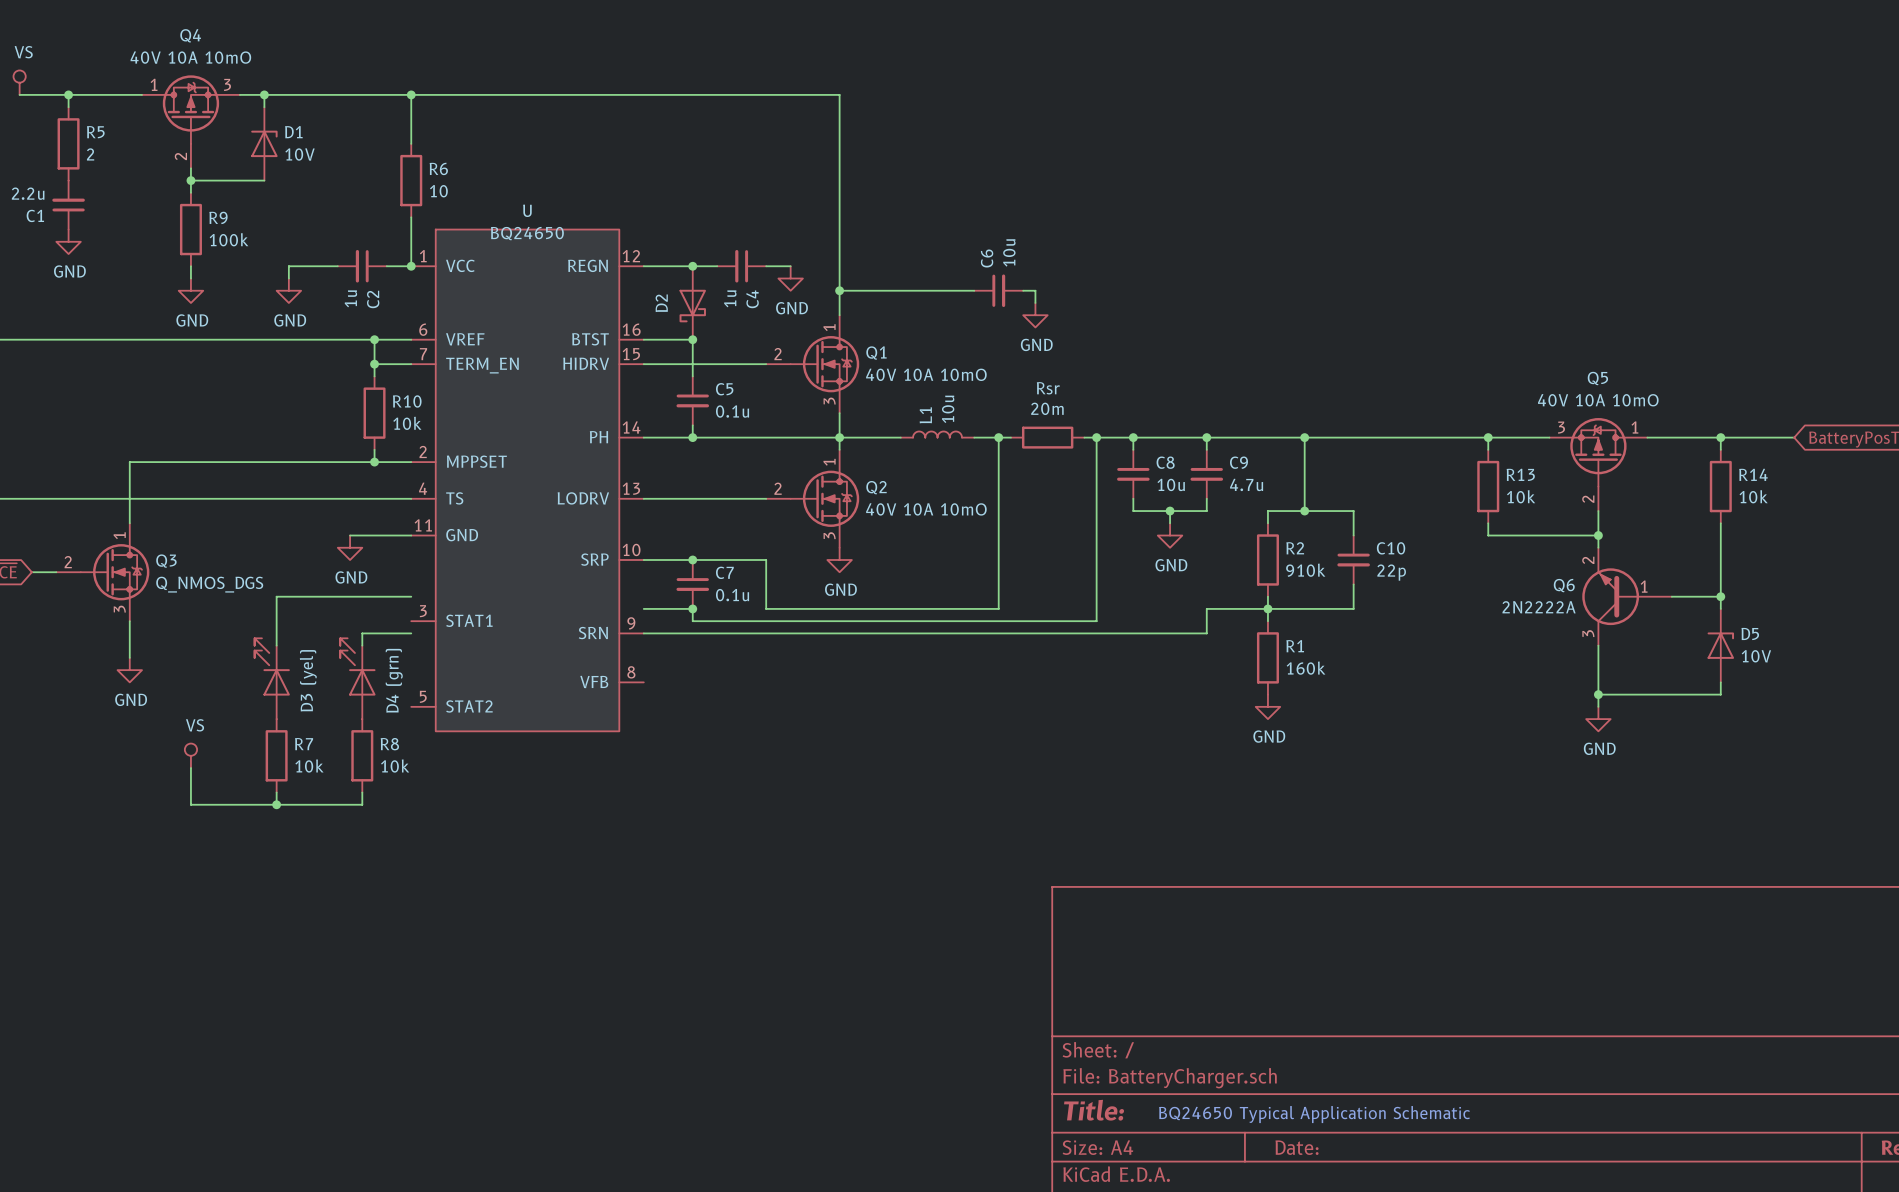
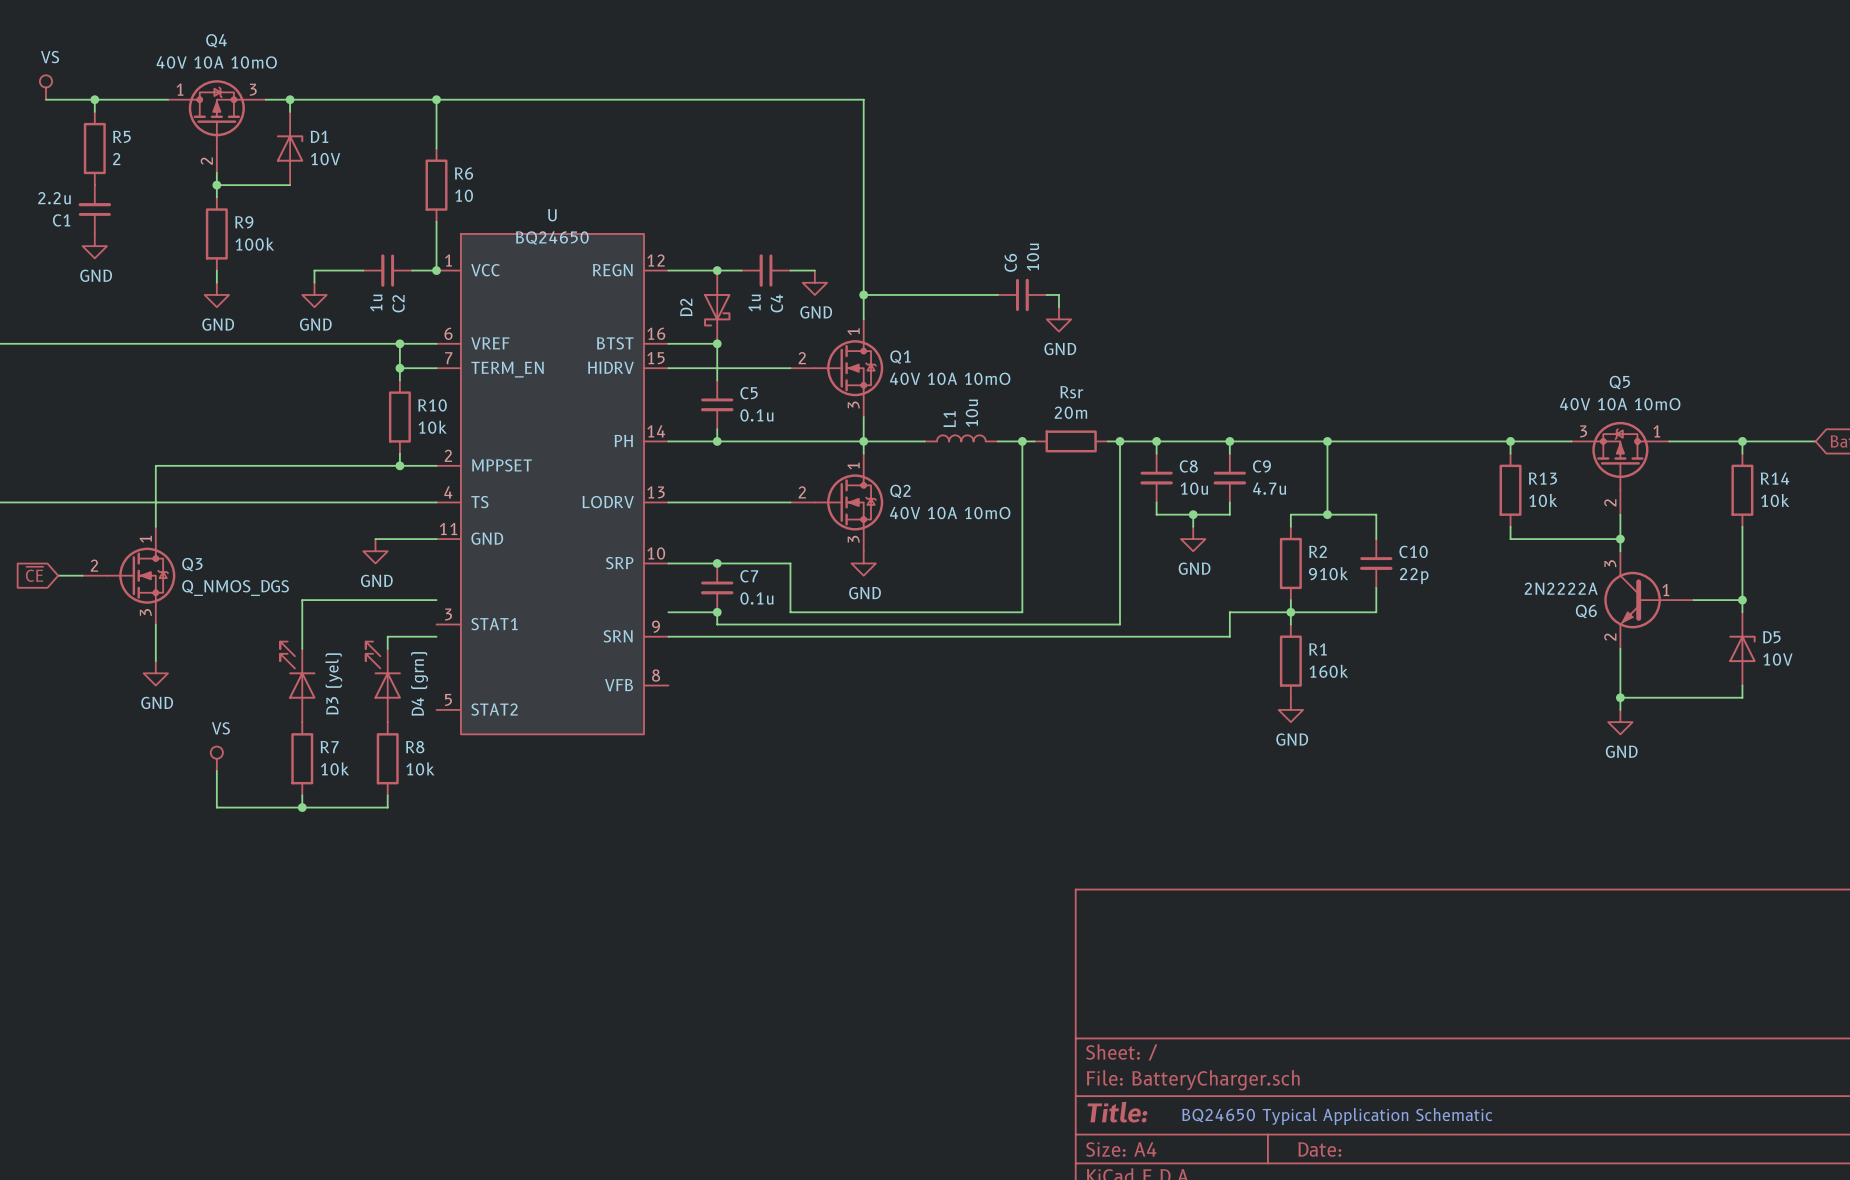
Q6 flip: as is (1610, 596) -> up-down (1632, 600)

